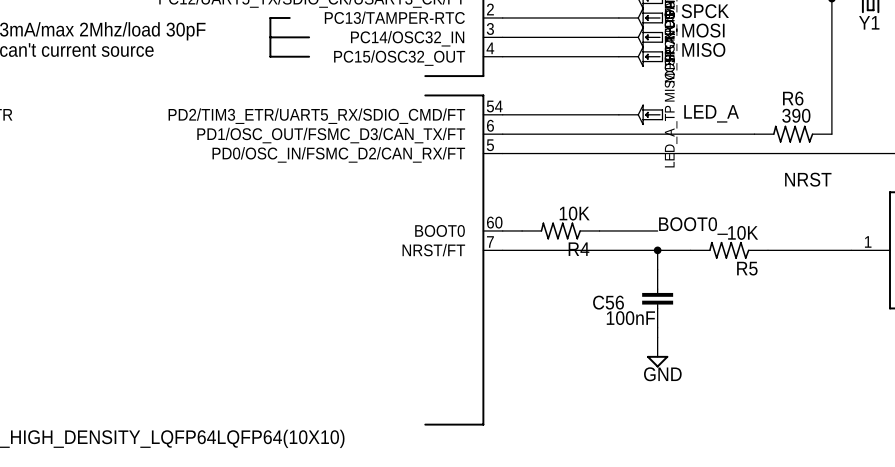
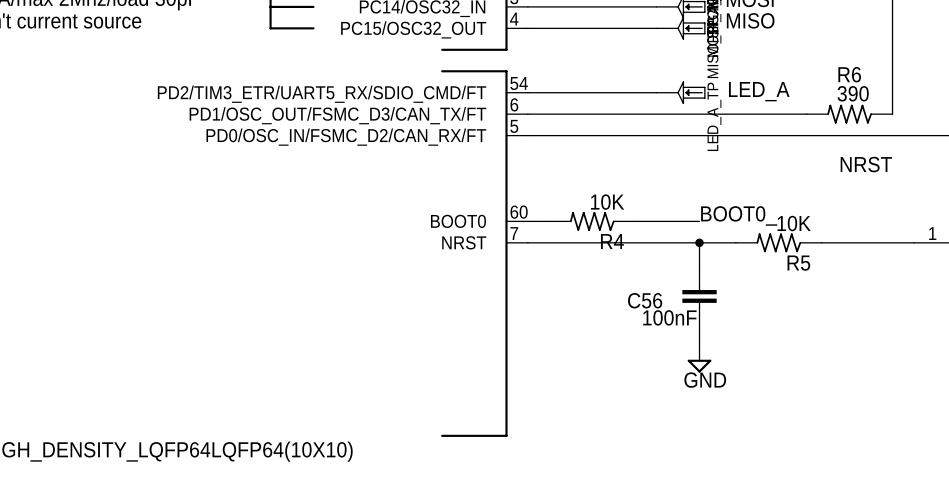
part pin name: NRST/FT (433, 250) -> NRST (464, 242)

